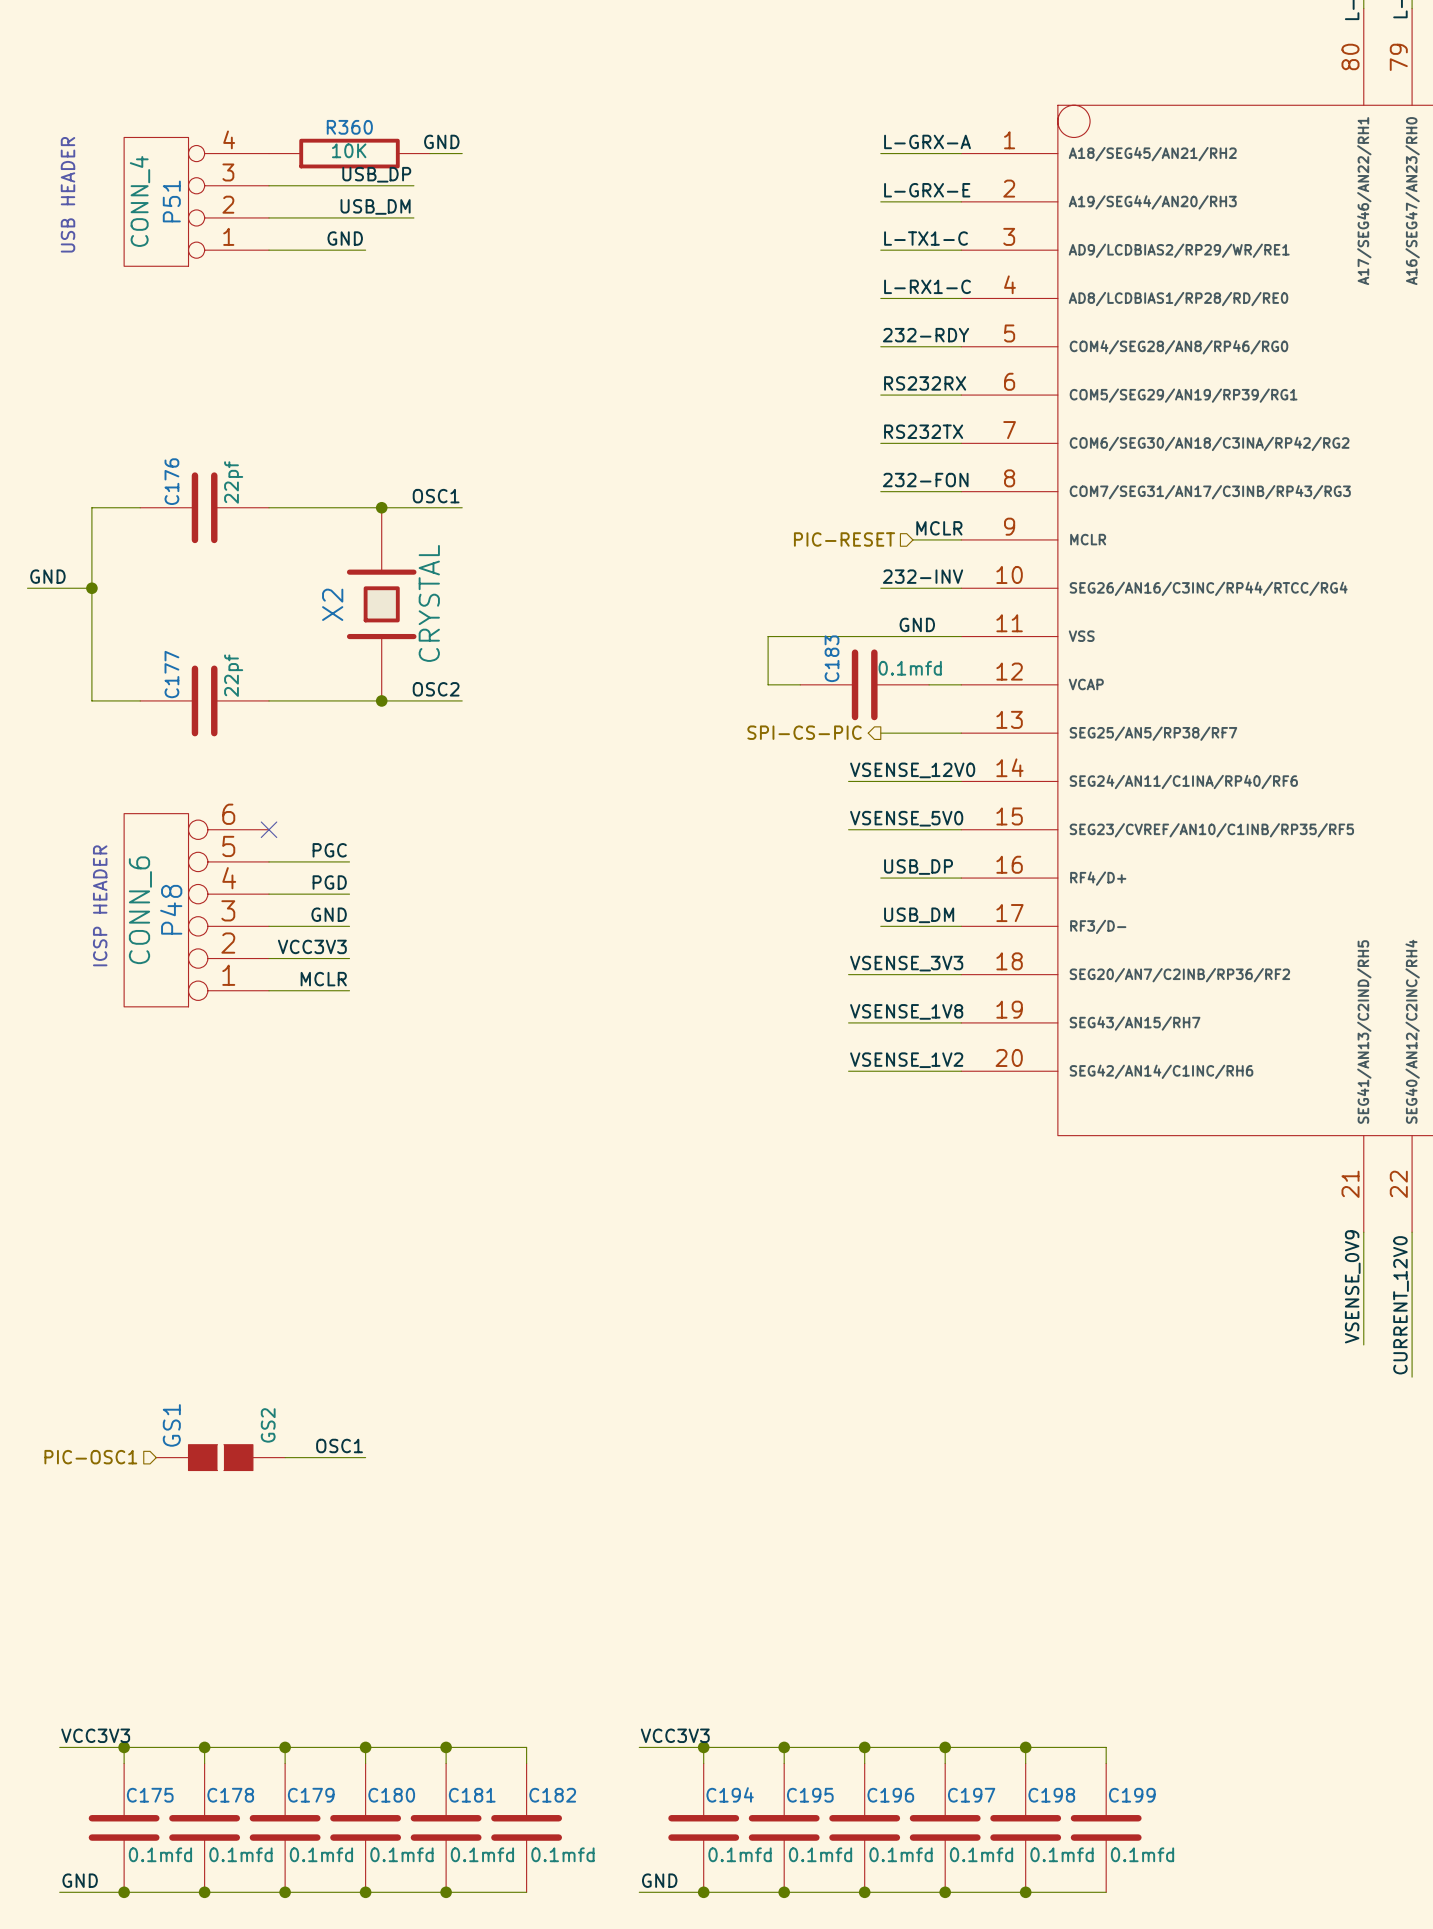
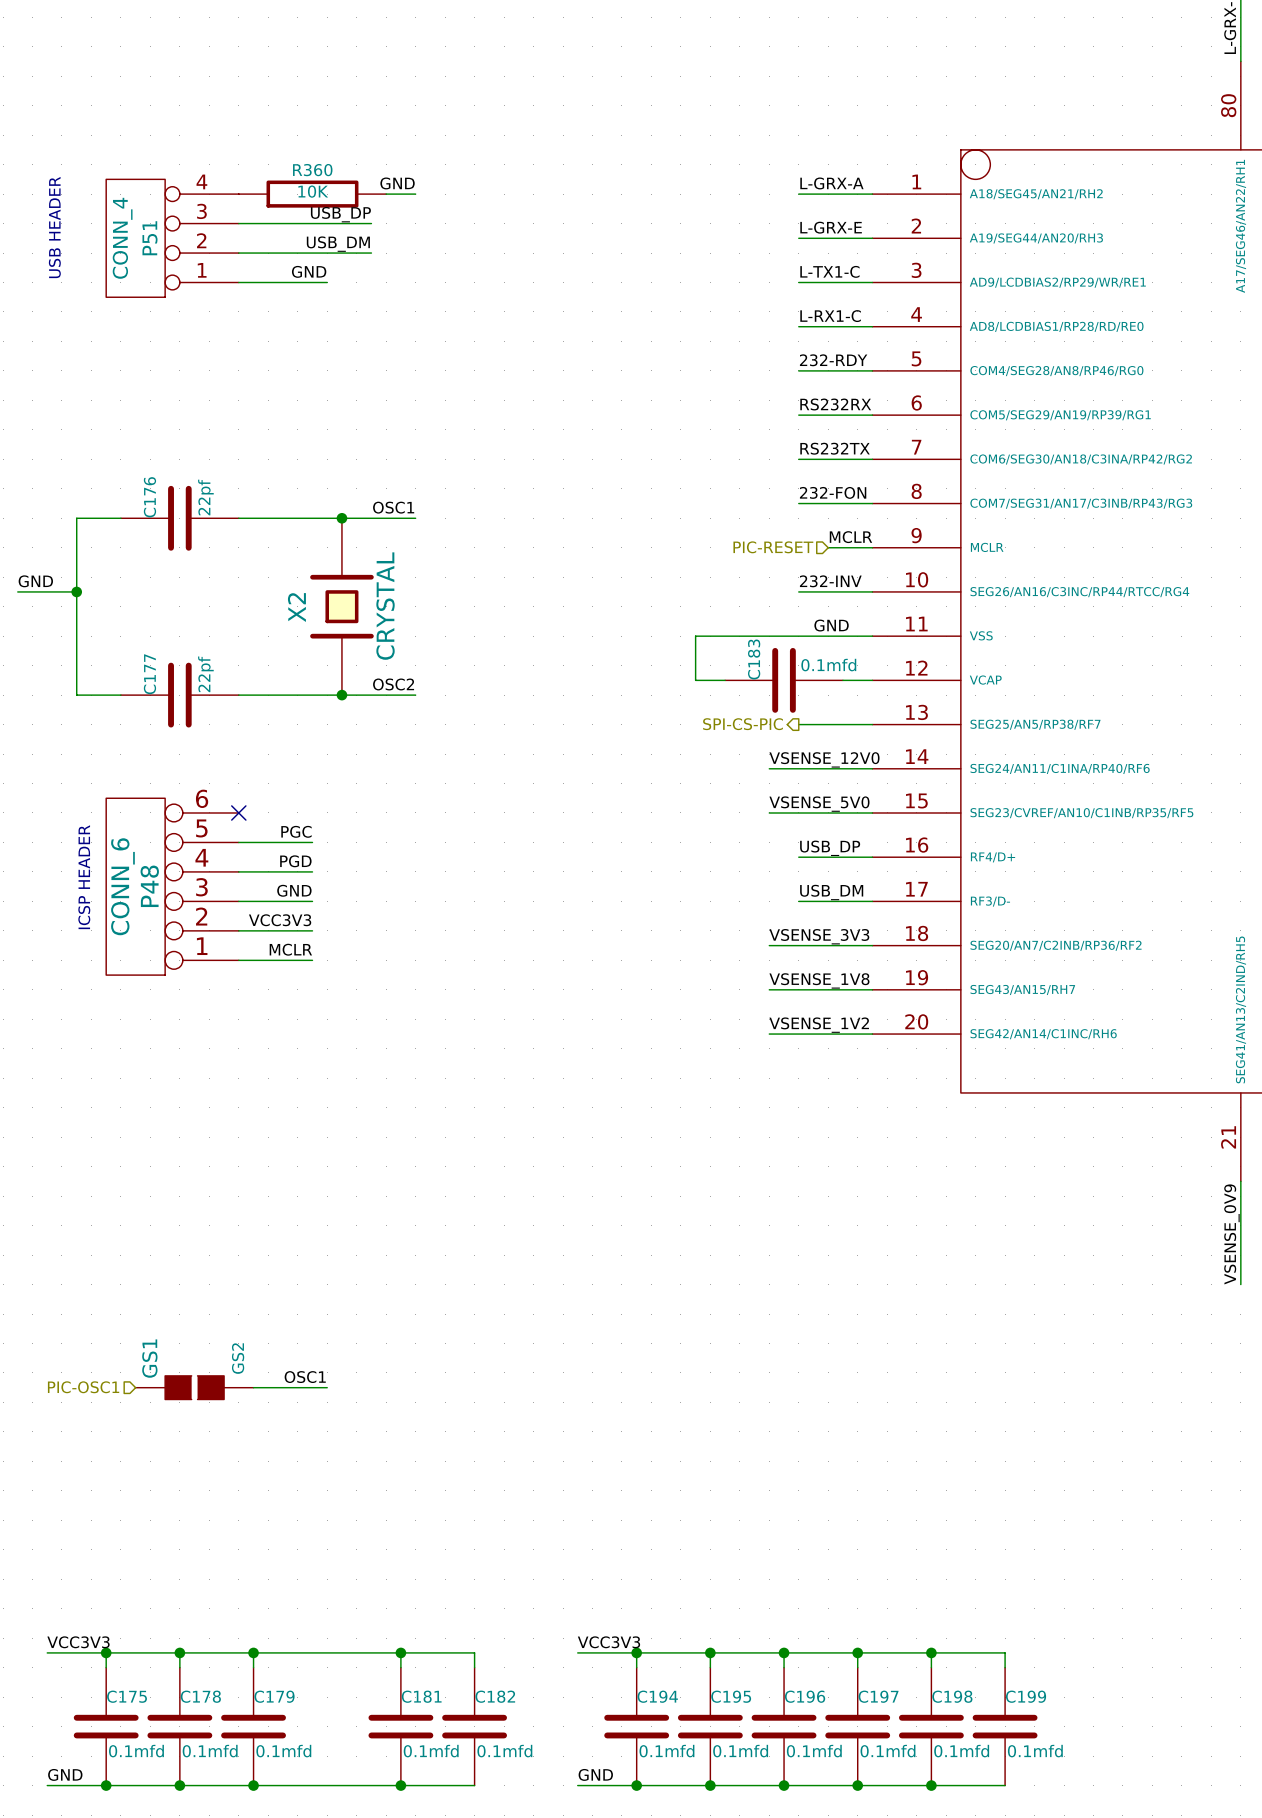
wire: (365, 1747) (365, 1763) -> none
junction: (365, 1747) -> none
C180: 0.1mfd (365, 1827) -> none
junction: (365, 1892) -> none

